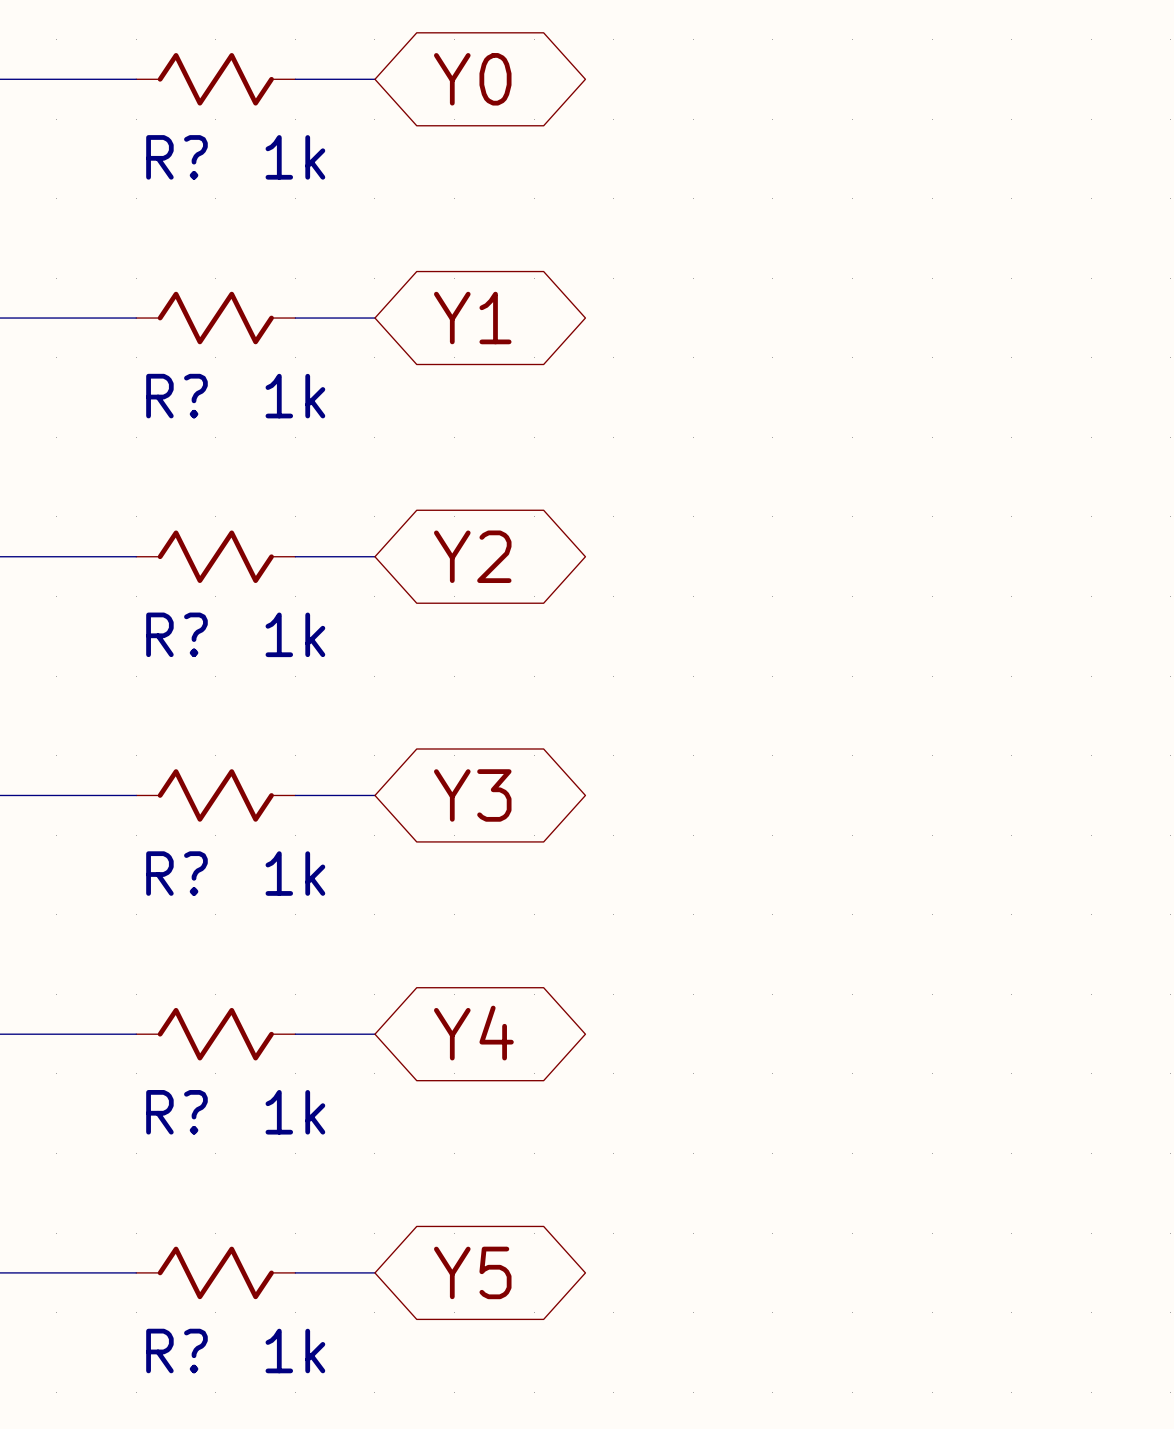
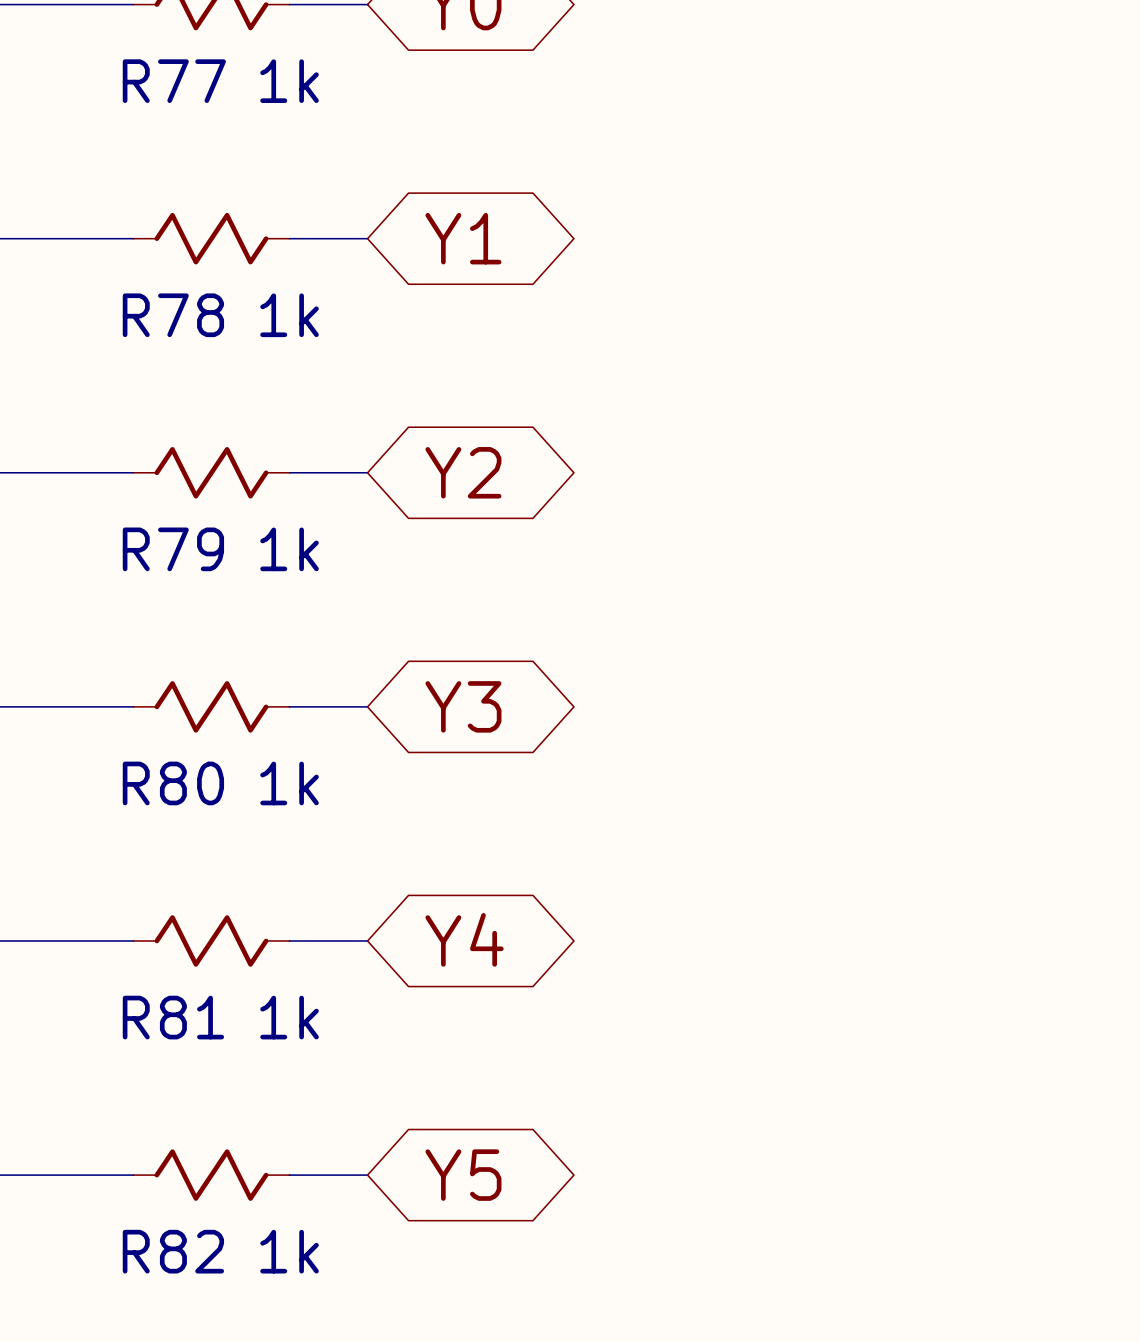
R? name: R? (176, 157) -> R77 (174, 81)
R? name: R? (176, 396) -> R78 (173, 315)
R? name: R? (176, 634) -> R79 (173, 549)
R? name: R? (176, 873) -> R80 (173, 783)
R? name: R? (176, 1112) -> R81 (173, 1017)
R? name: R? (176, 1351) -> R82 (173, 1251)

